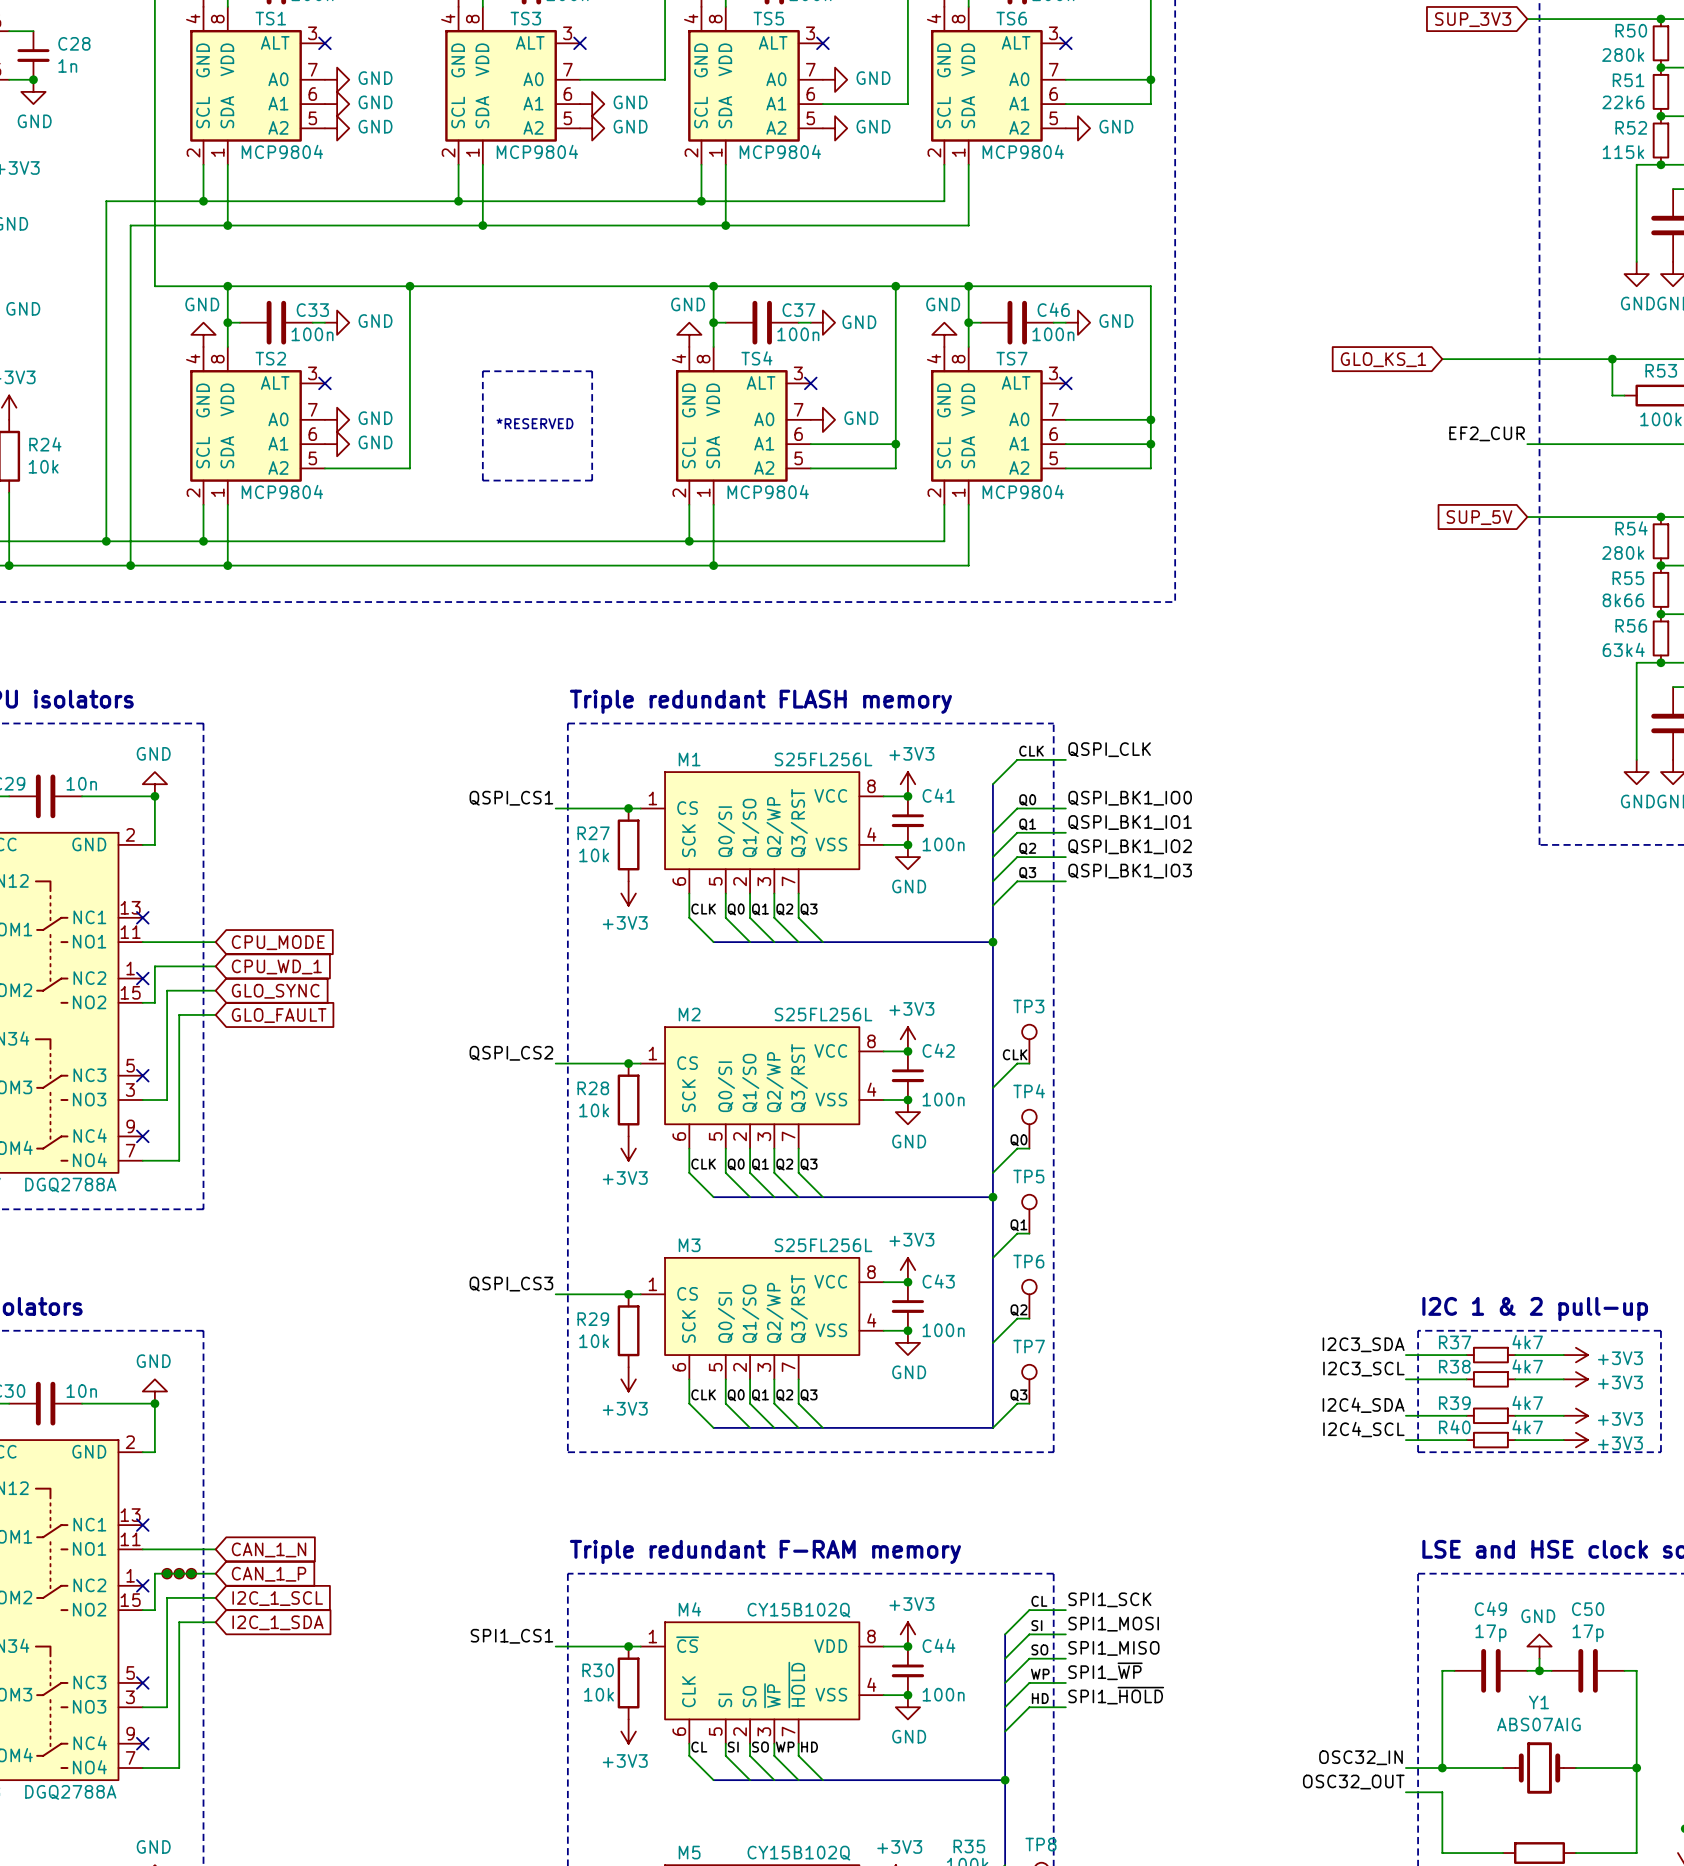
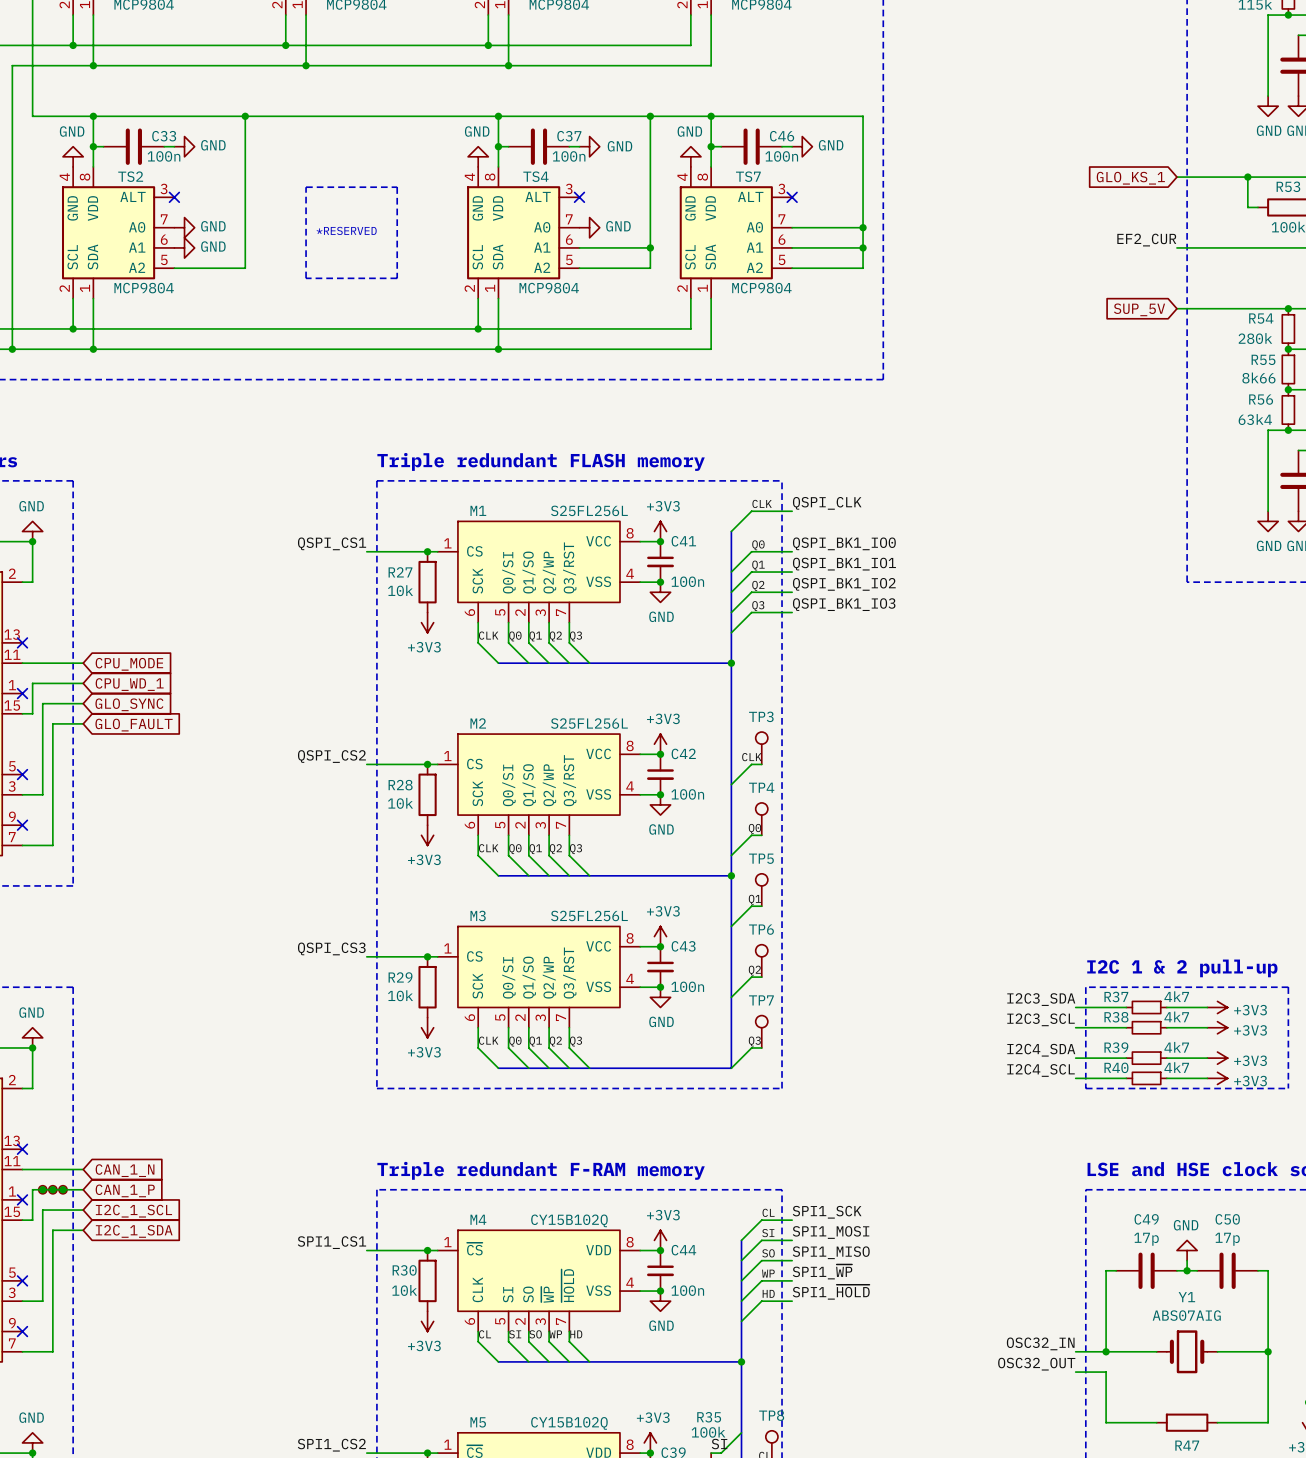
global label position: GLO_KS_1 (1383, 359) -> GLO_KS_1 (1130, 178)
wire: (1442, 359) (1527, 359) -> none

